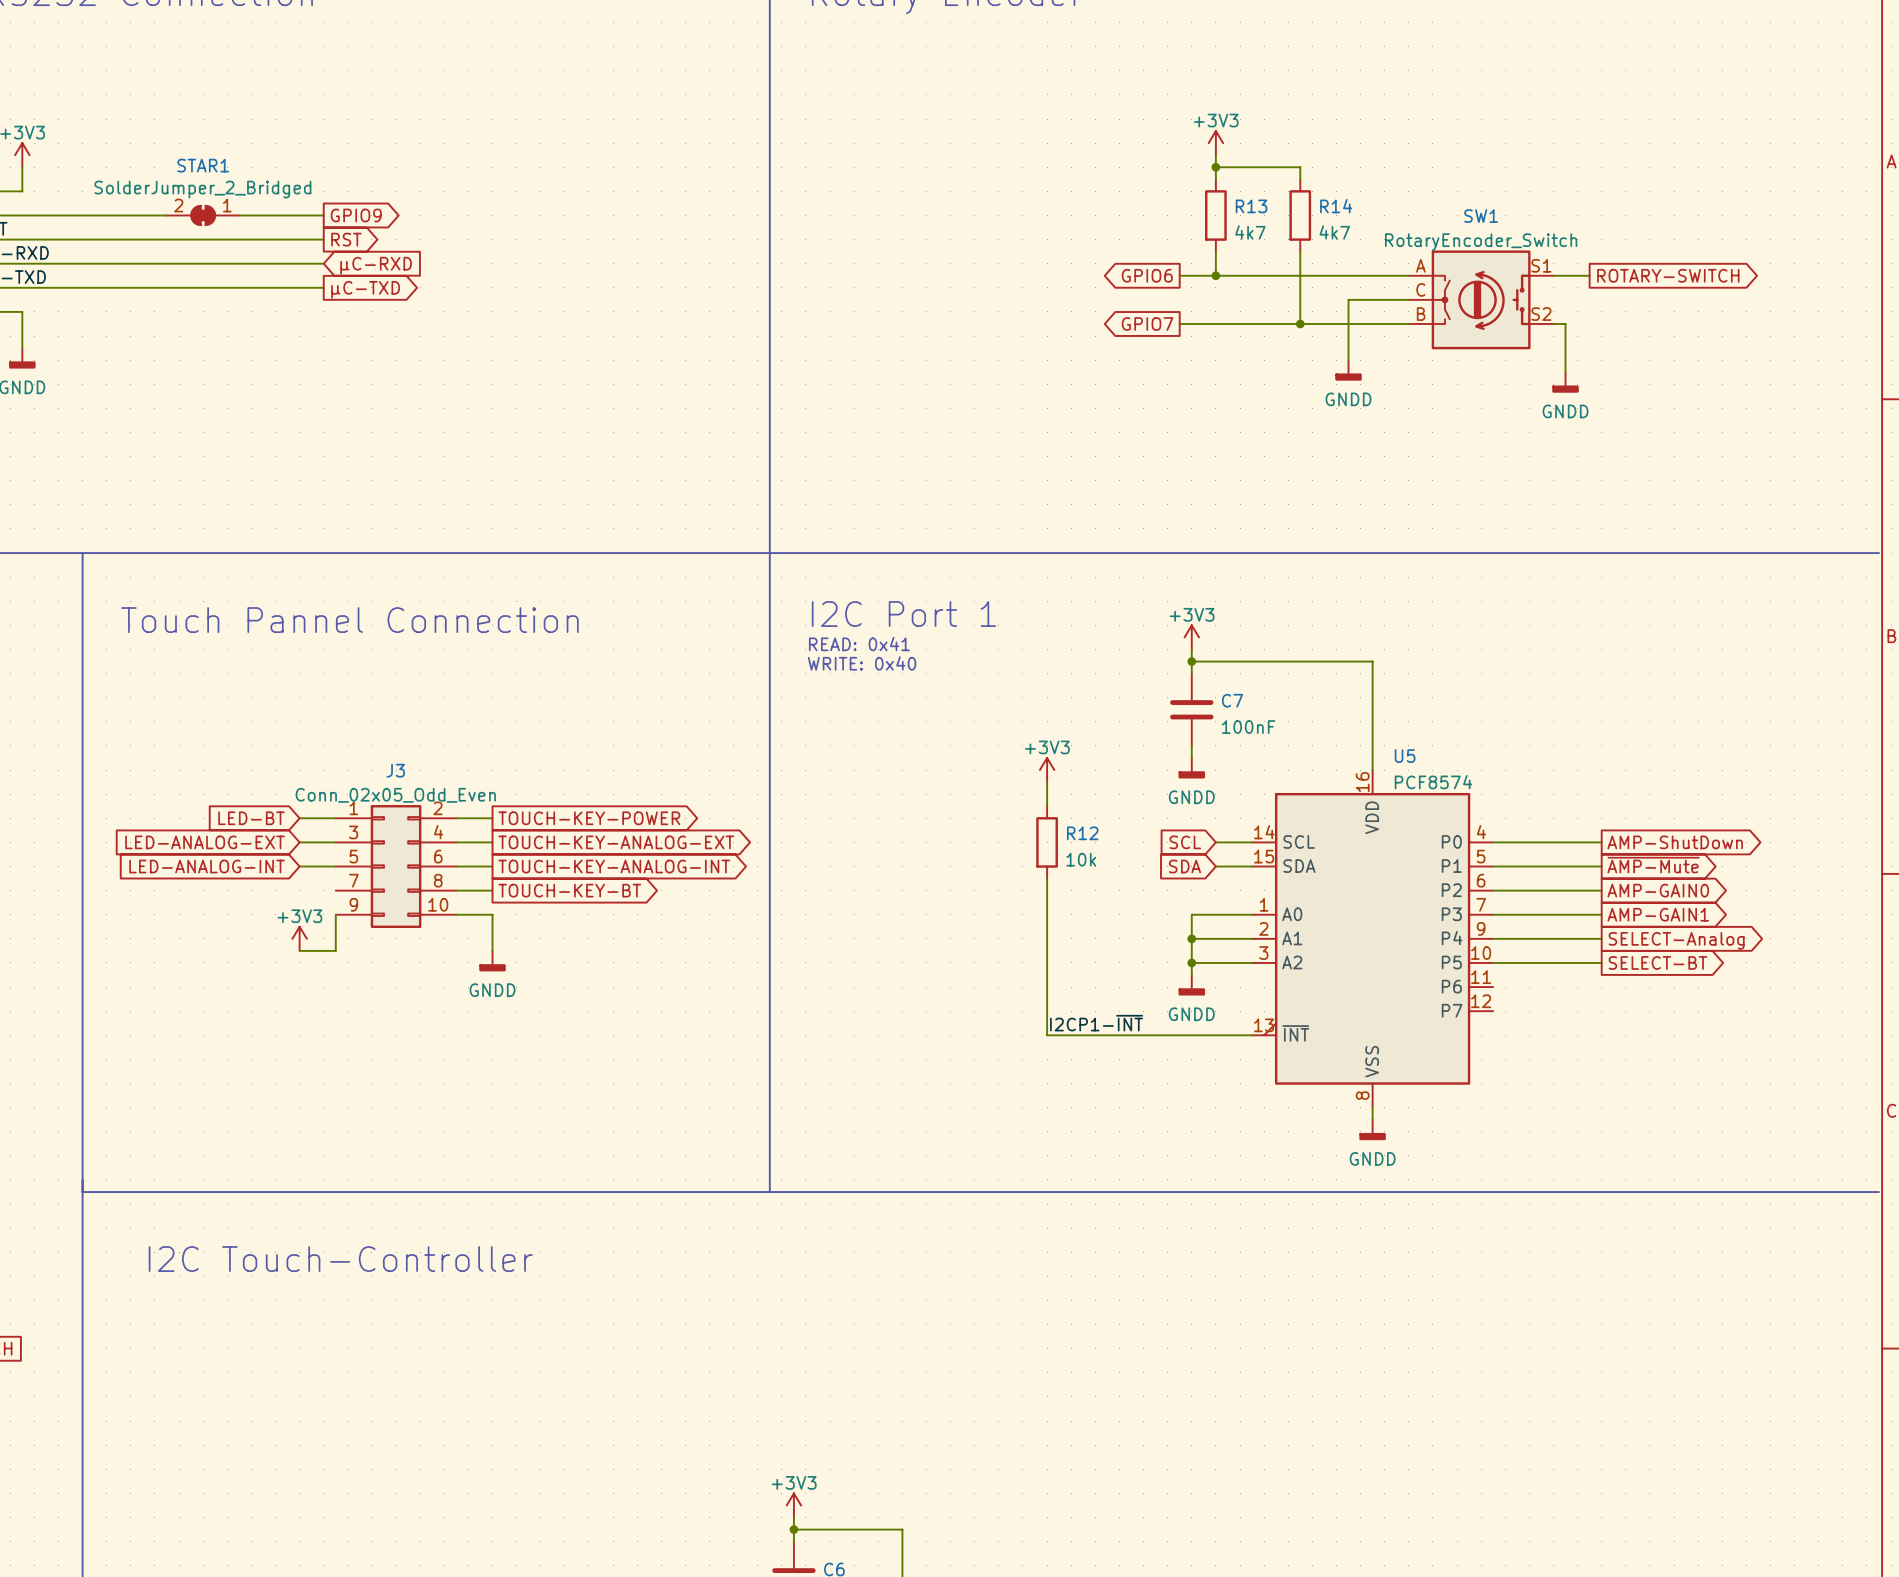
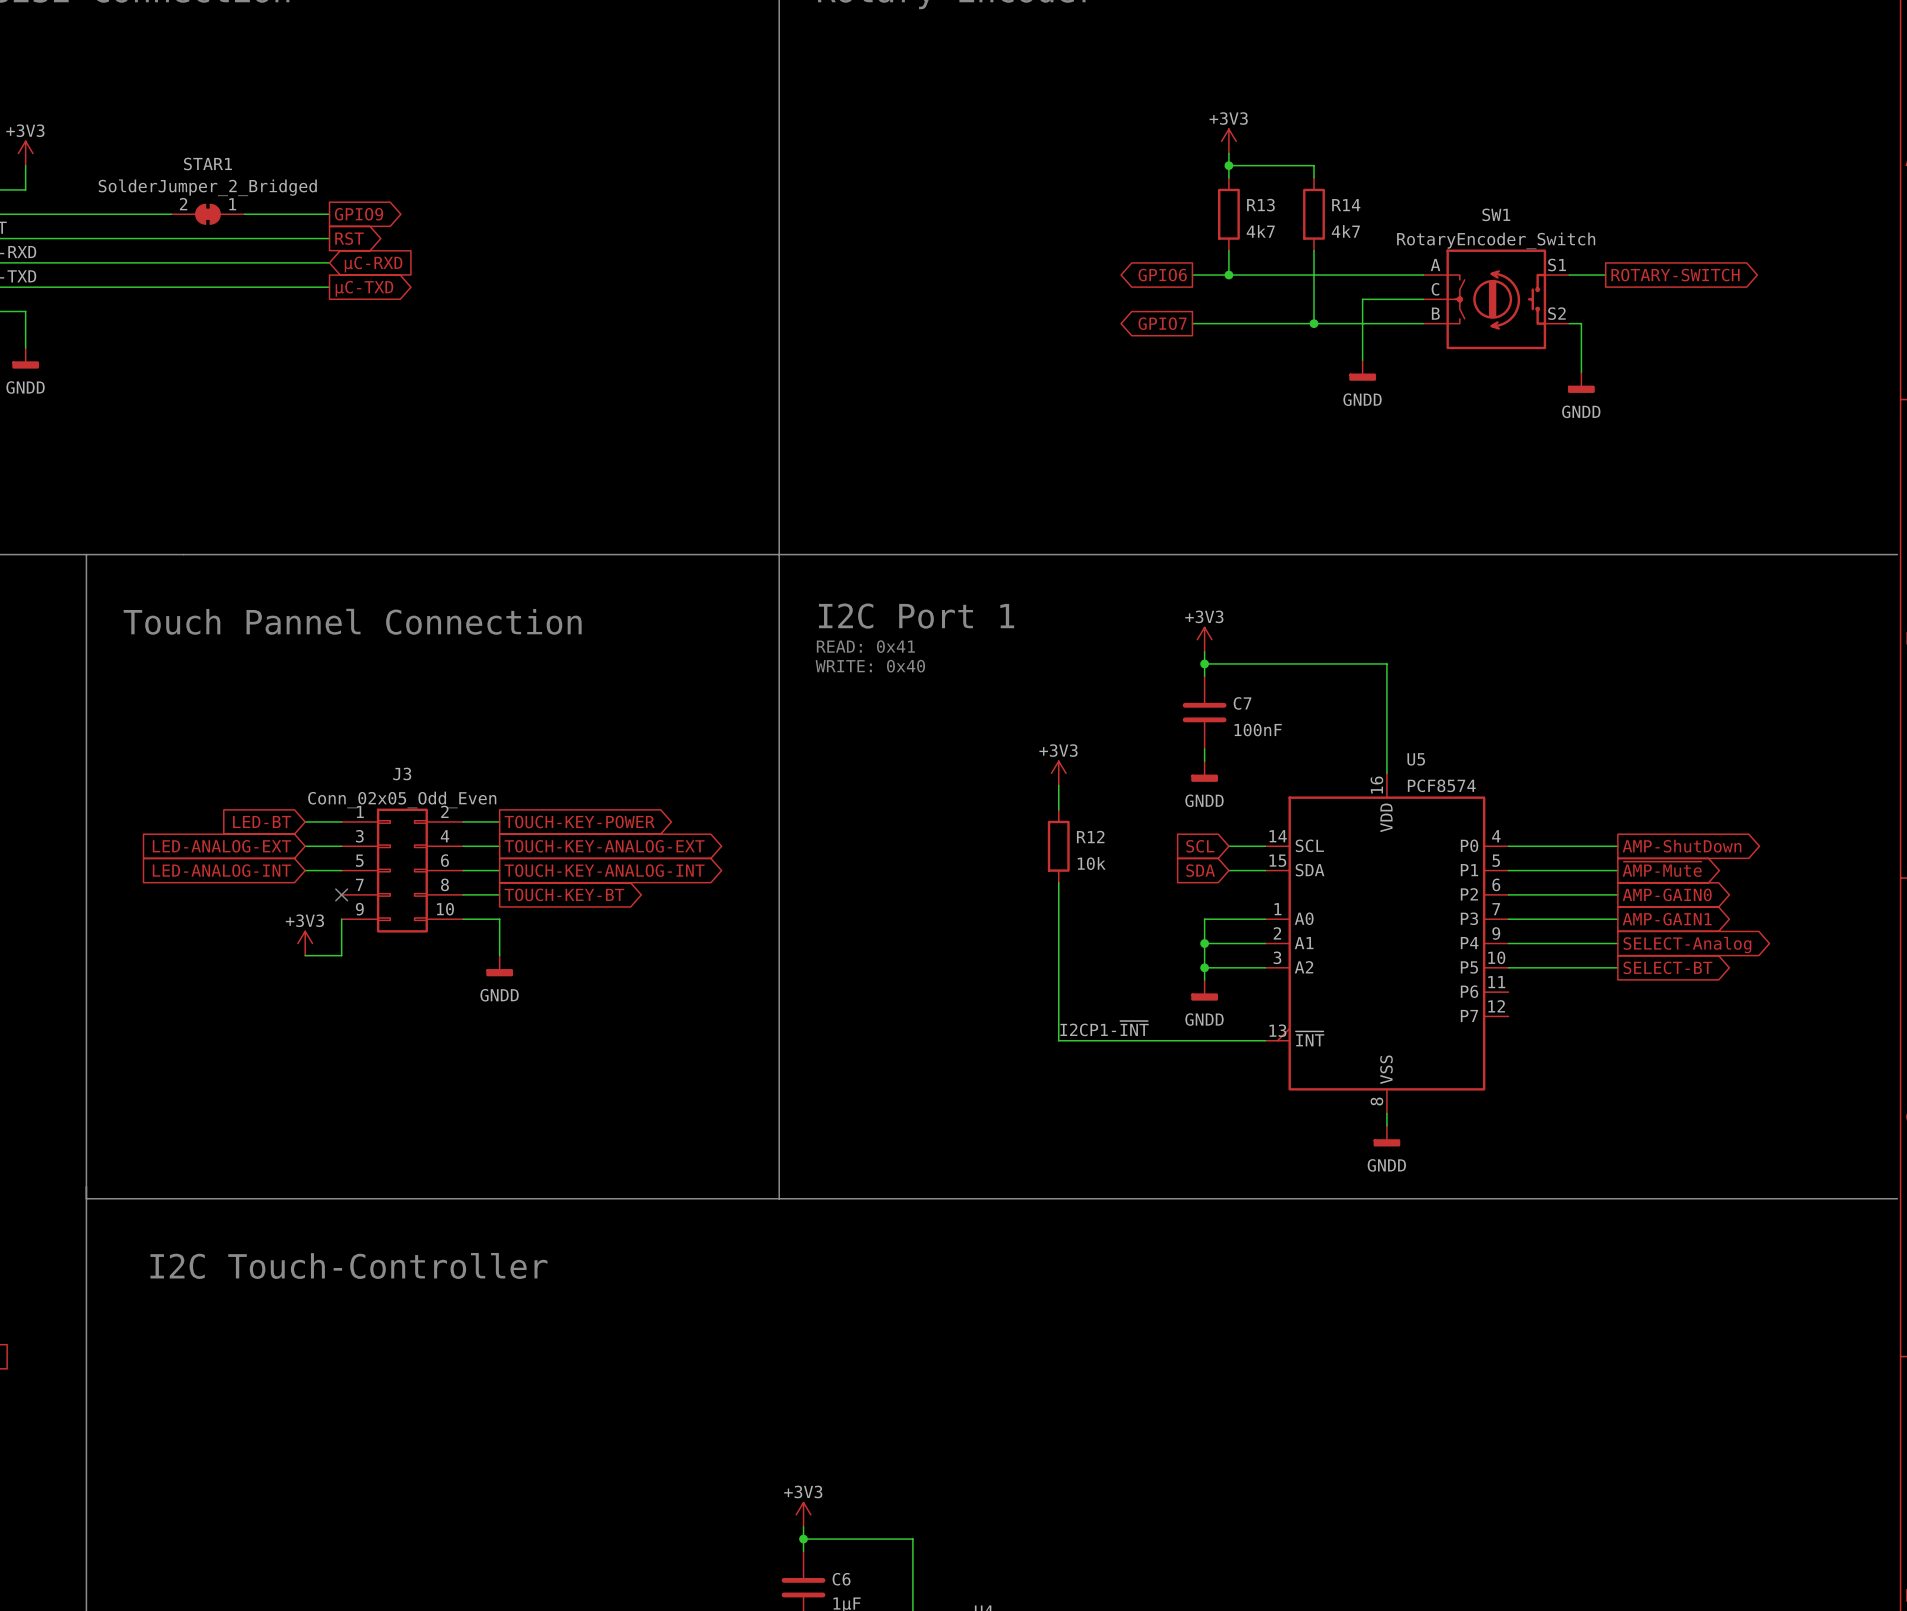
no-connect mark: none -> (341, 894)

